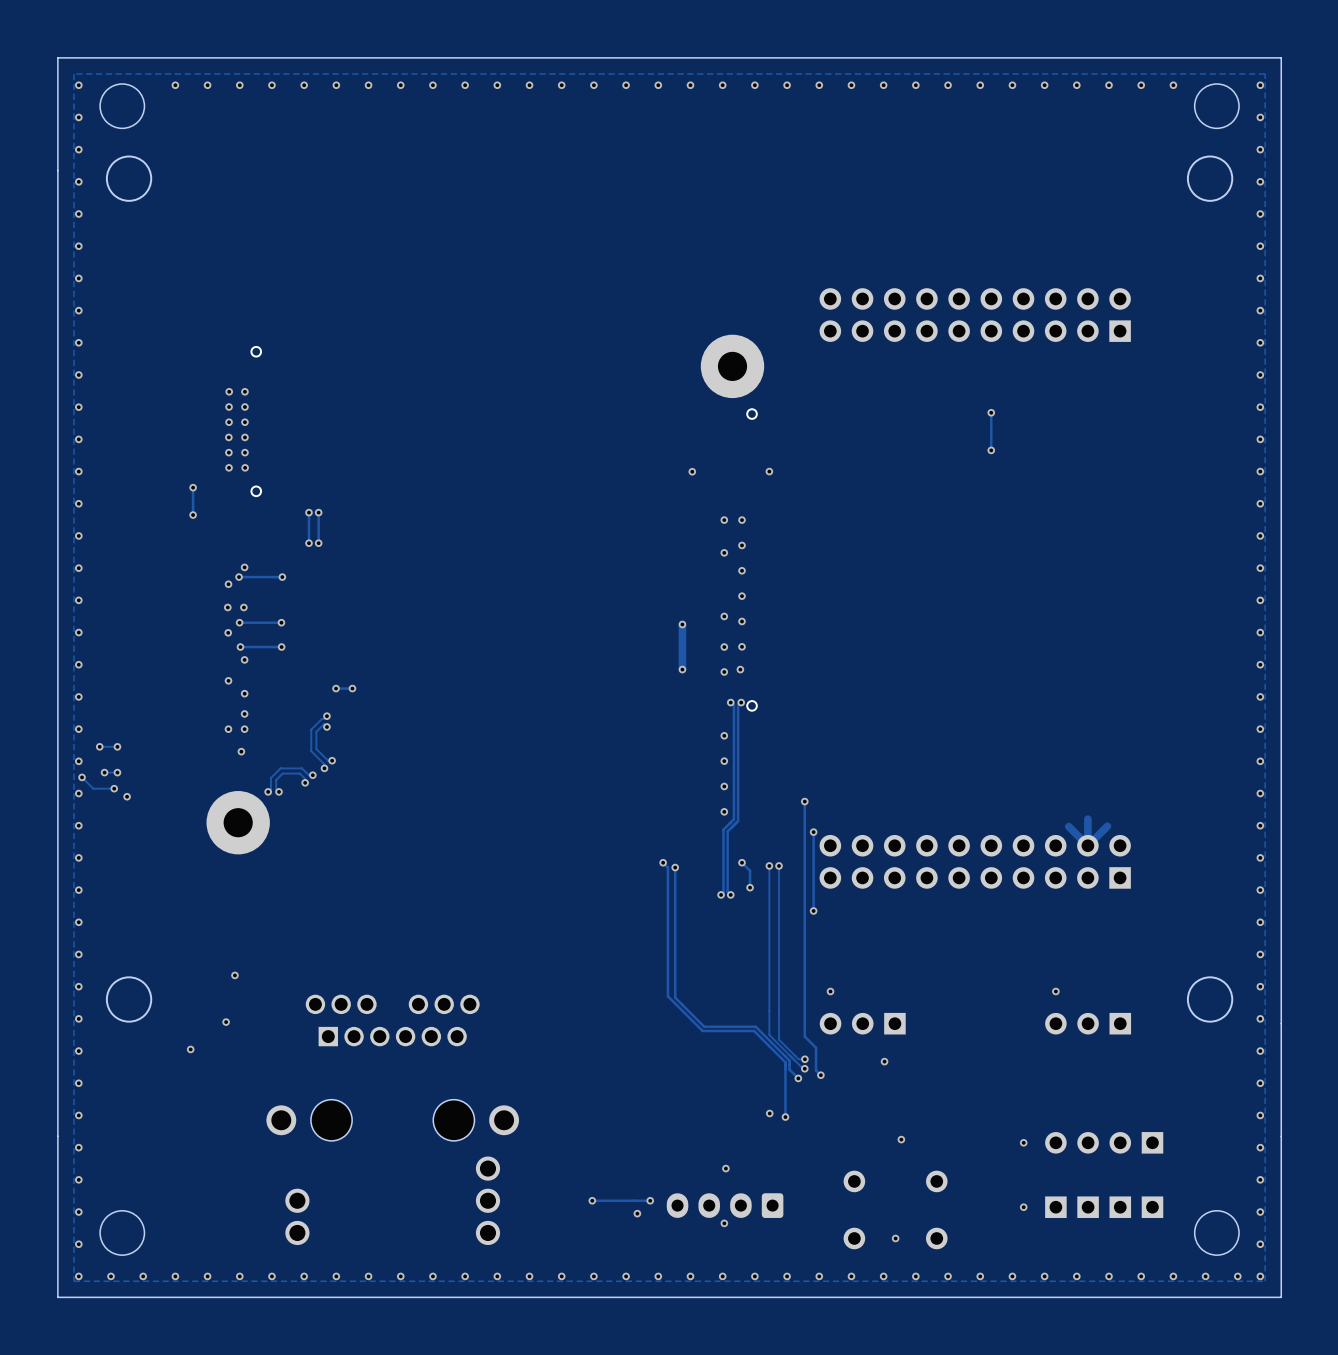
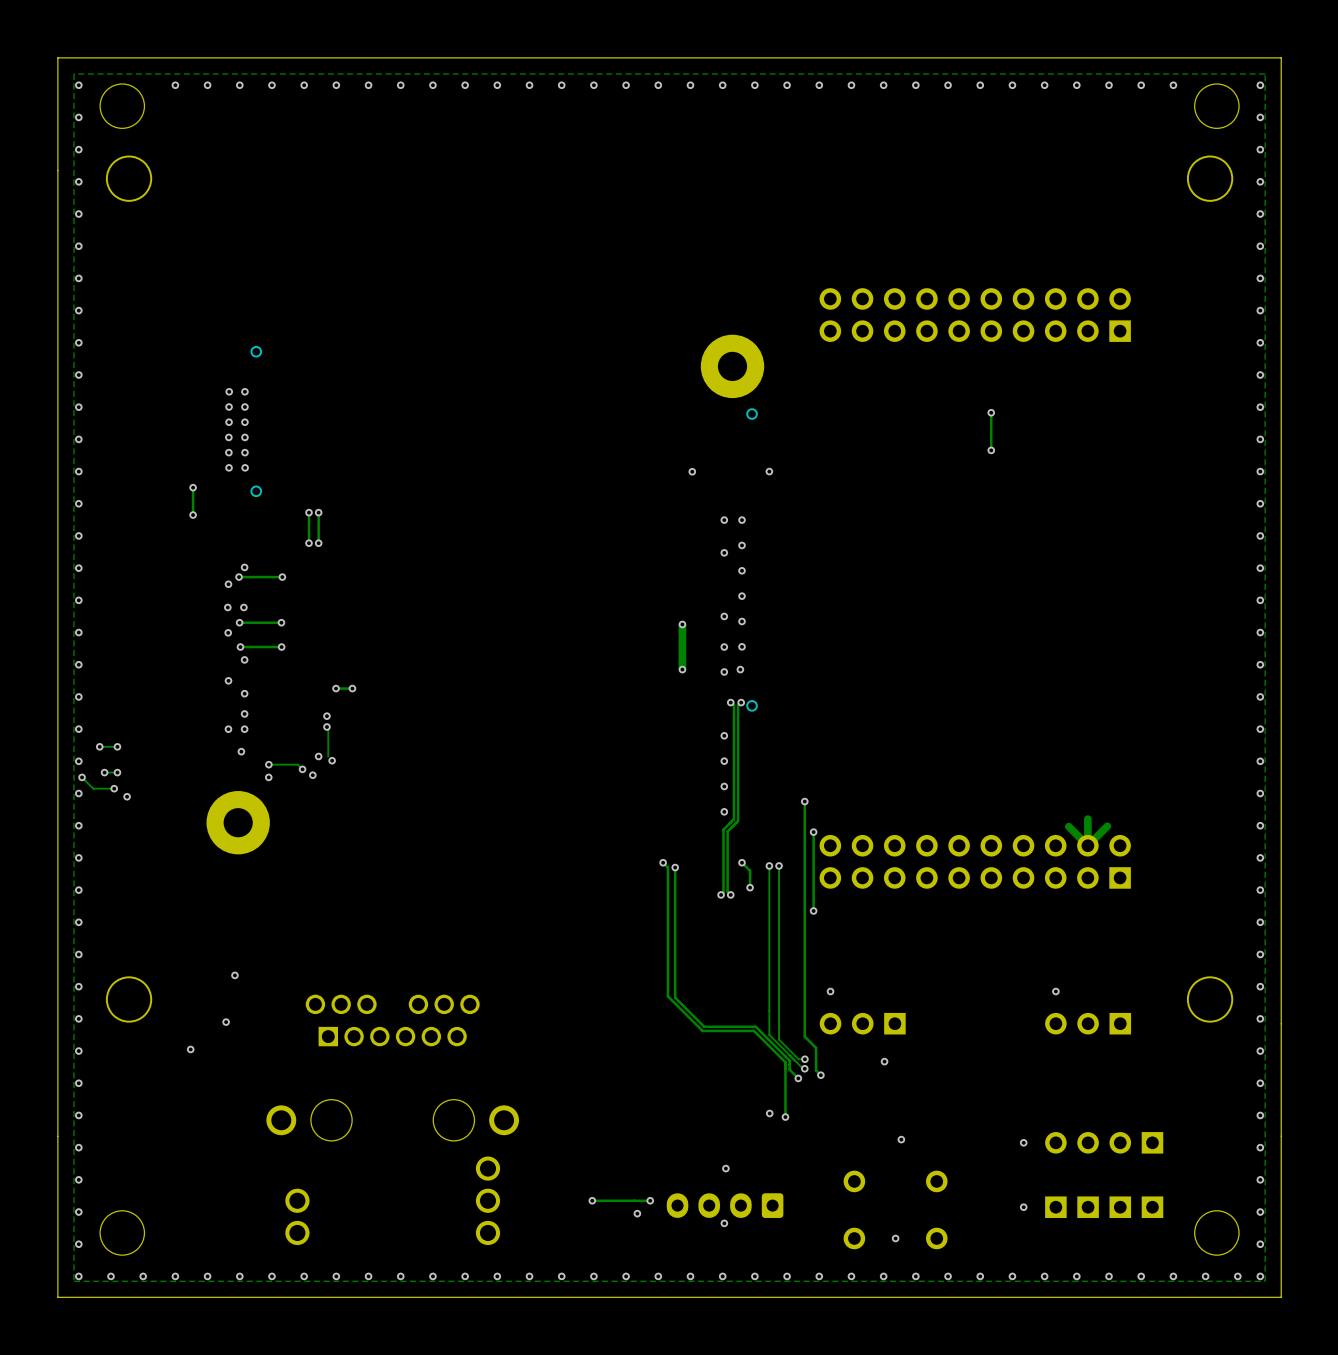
track: (326, 716) (311, 729) (311, 751) (324, 764) (324, 768) -> none
track: (324, 724) (316, 731) (316, 748) (328, 760) (332, 760) -> none
track: none -> (328, 727) (328, 756)
via: none -> (318, 756)
track: none -> (268, 764) (297, 764) (302, 769)
via: none -> (268, 764)
via: (324, 768) -> none
via: none -> (302, 769)
track: (312, 775) (308, 775) (302, 768) (280, 768) (271, 777) (271, 789) (268, 791) -> none
via: none -> (268, 777)
track: (305, 782) (305, 778) (299, 773) (282, 773) (276, 780) (276, 789) (278, 791) -> none
via: (305, 782) -> none
via: (268, 791) -> none
via: (278, 791) -> none

